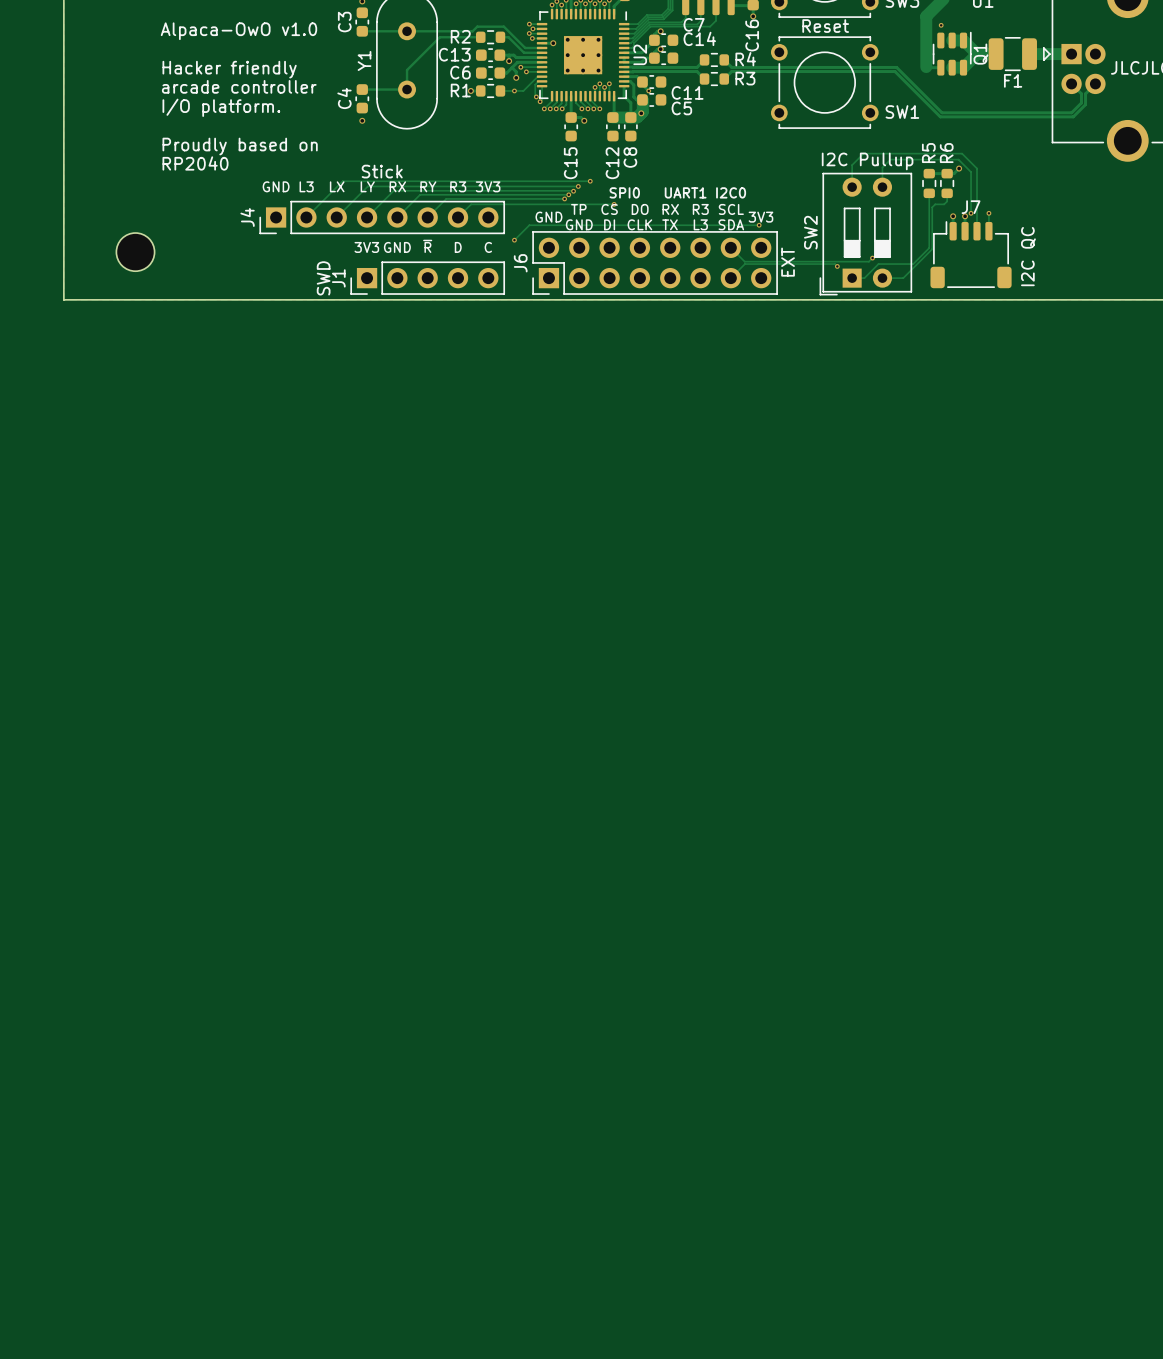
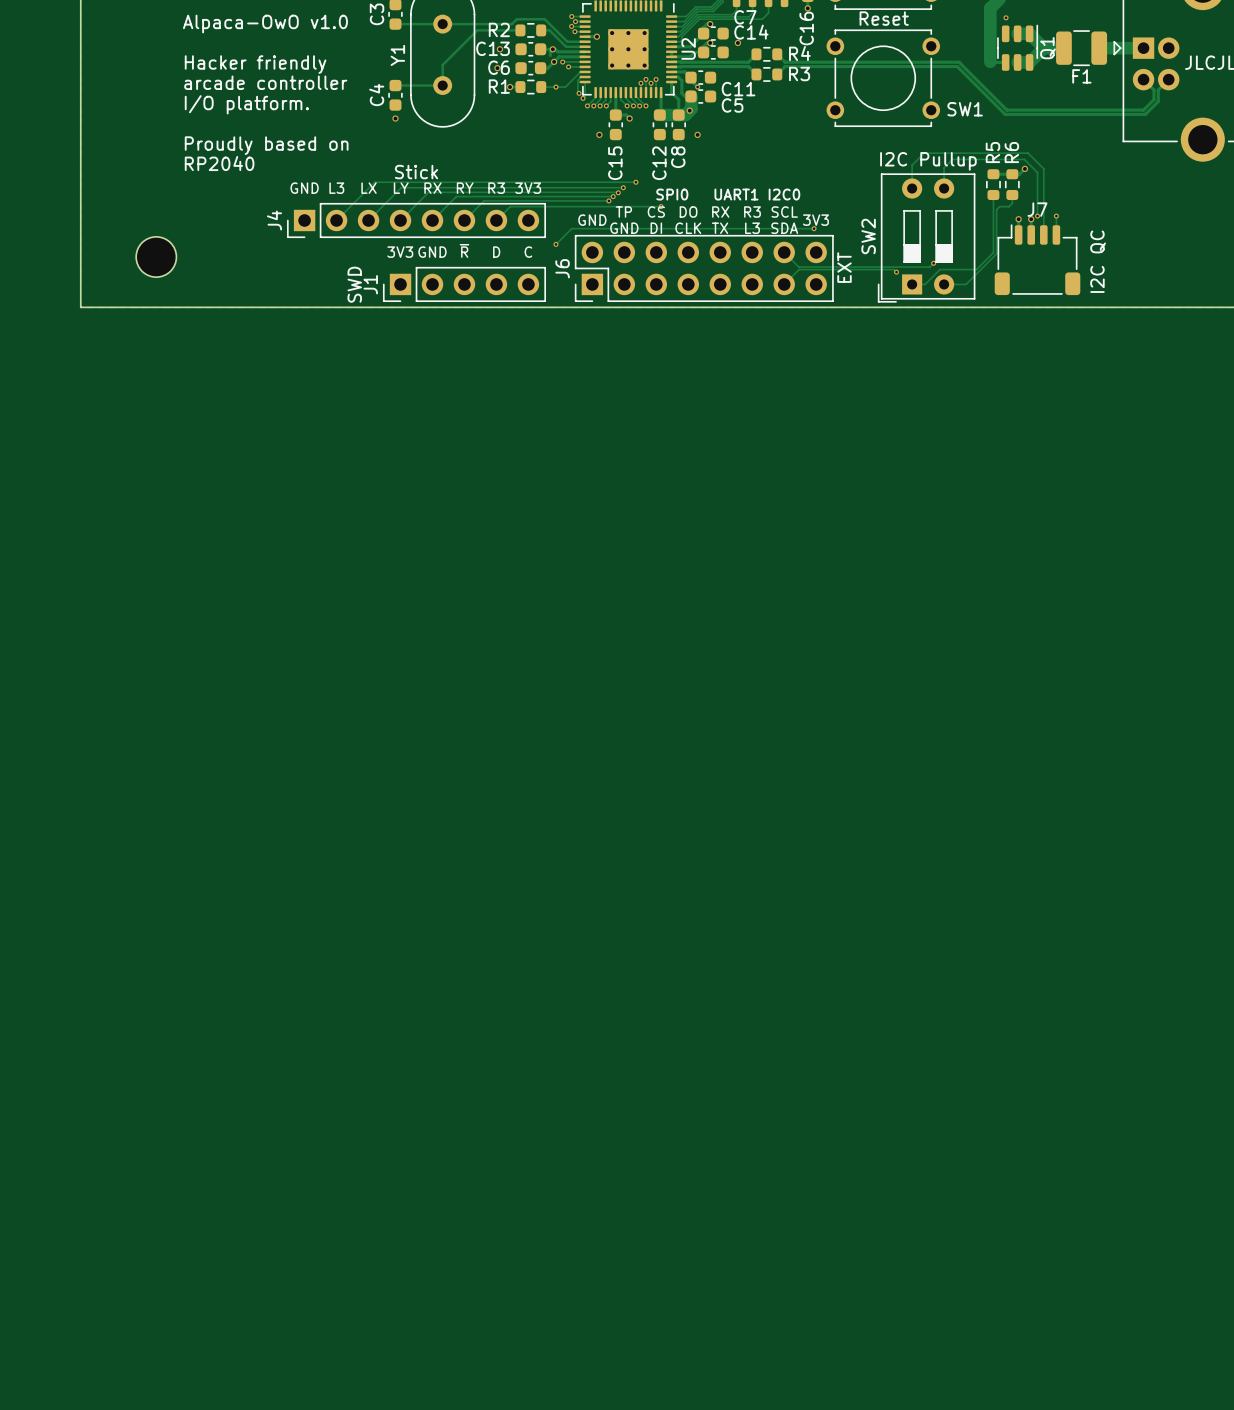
via: none -> (737, 42)
via: none -> (499, 49)
via: none -> (552, 49)
via: (509, 61) -> none
track: (512, 67) (516, 71) (516, 77) -> none
via: none -> (554, 61)
via: none -> (497, 68)
via: (516, 77) -> none
via: none -> (599, 134)
via: none -> (697, 134)

